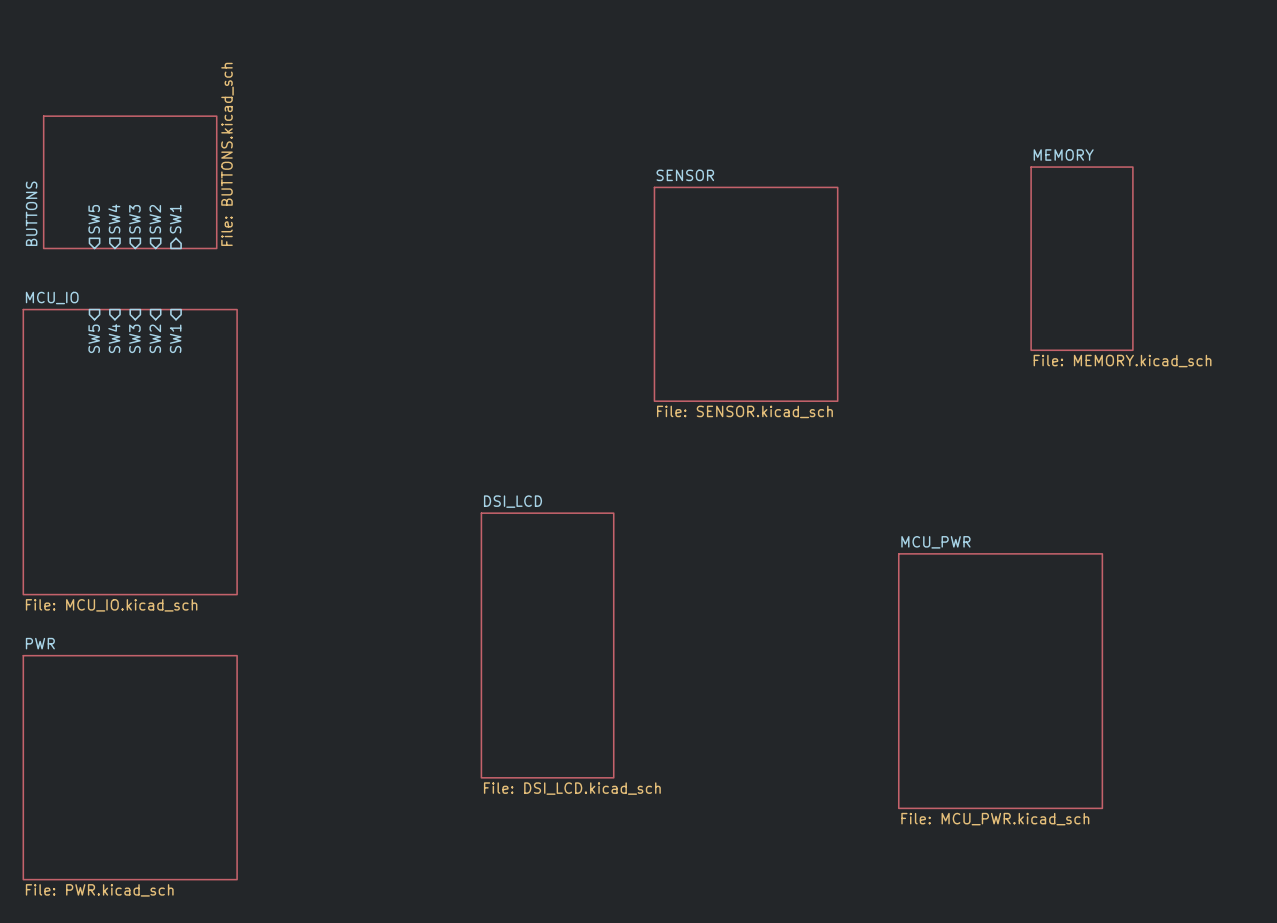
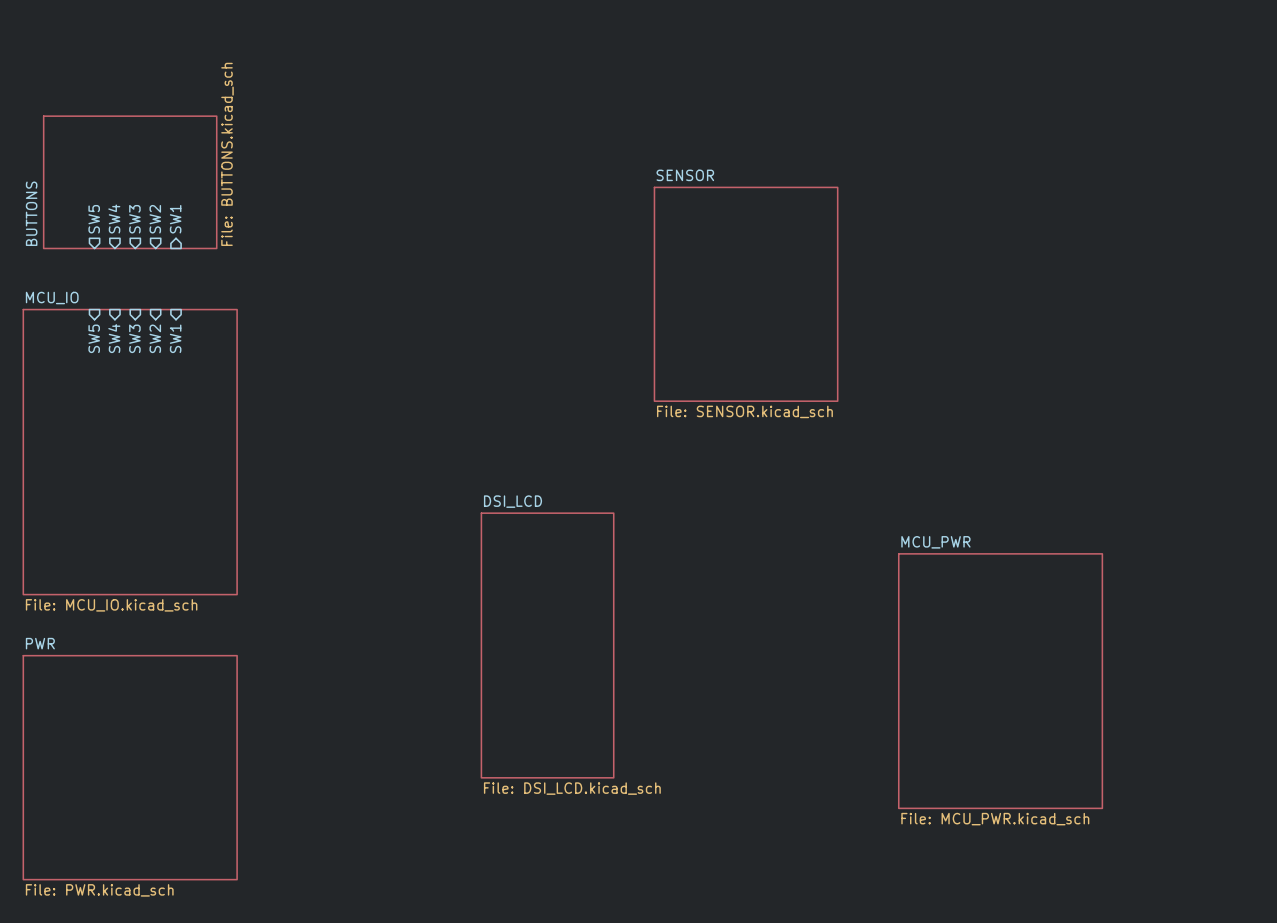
sheet MEMORY: File: MEMORY.kicad_sch (1082, 258) -> none

